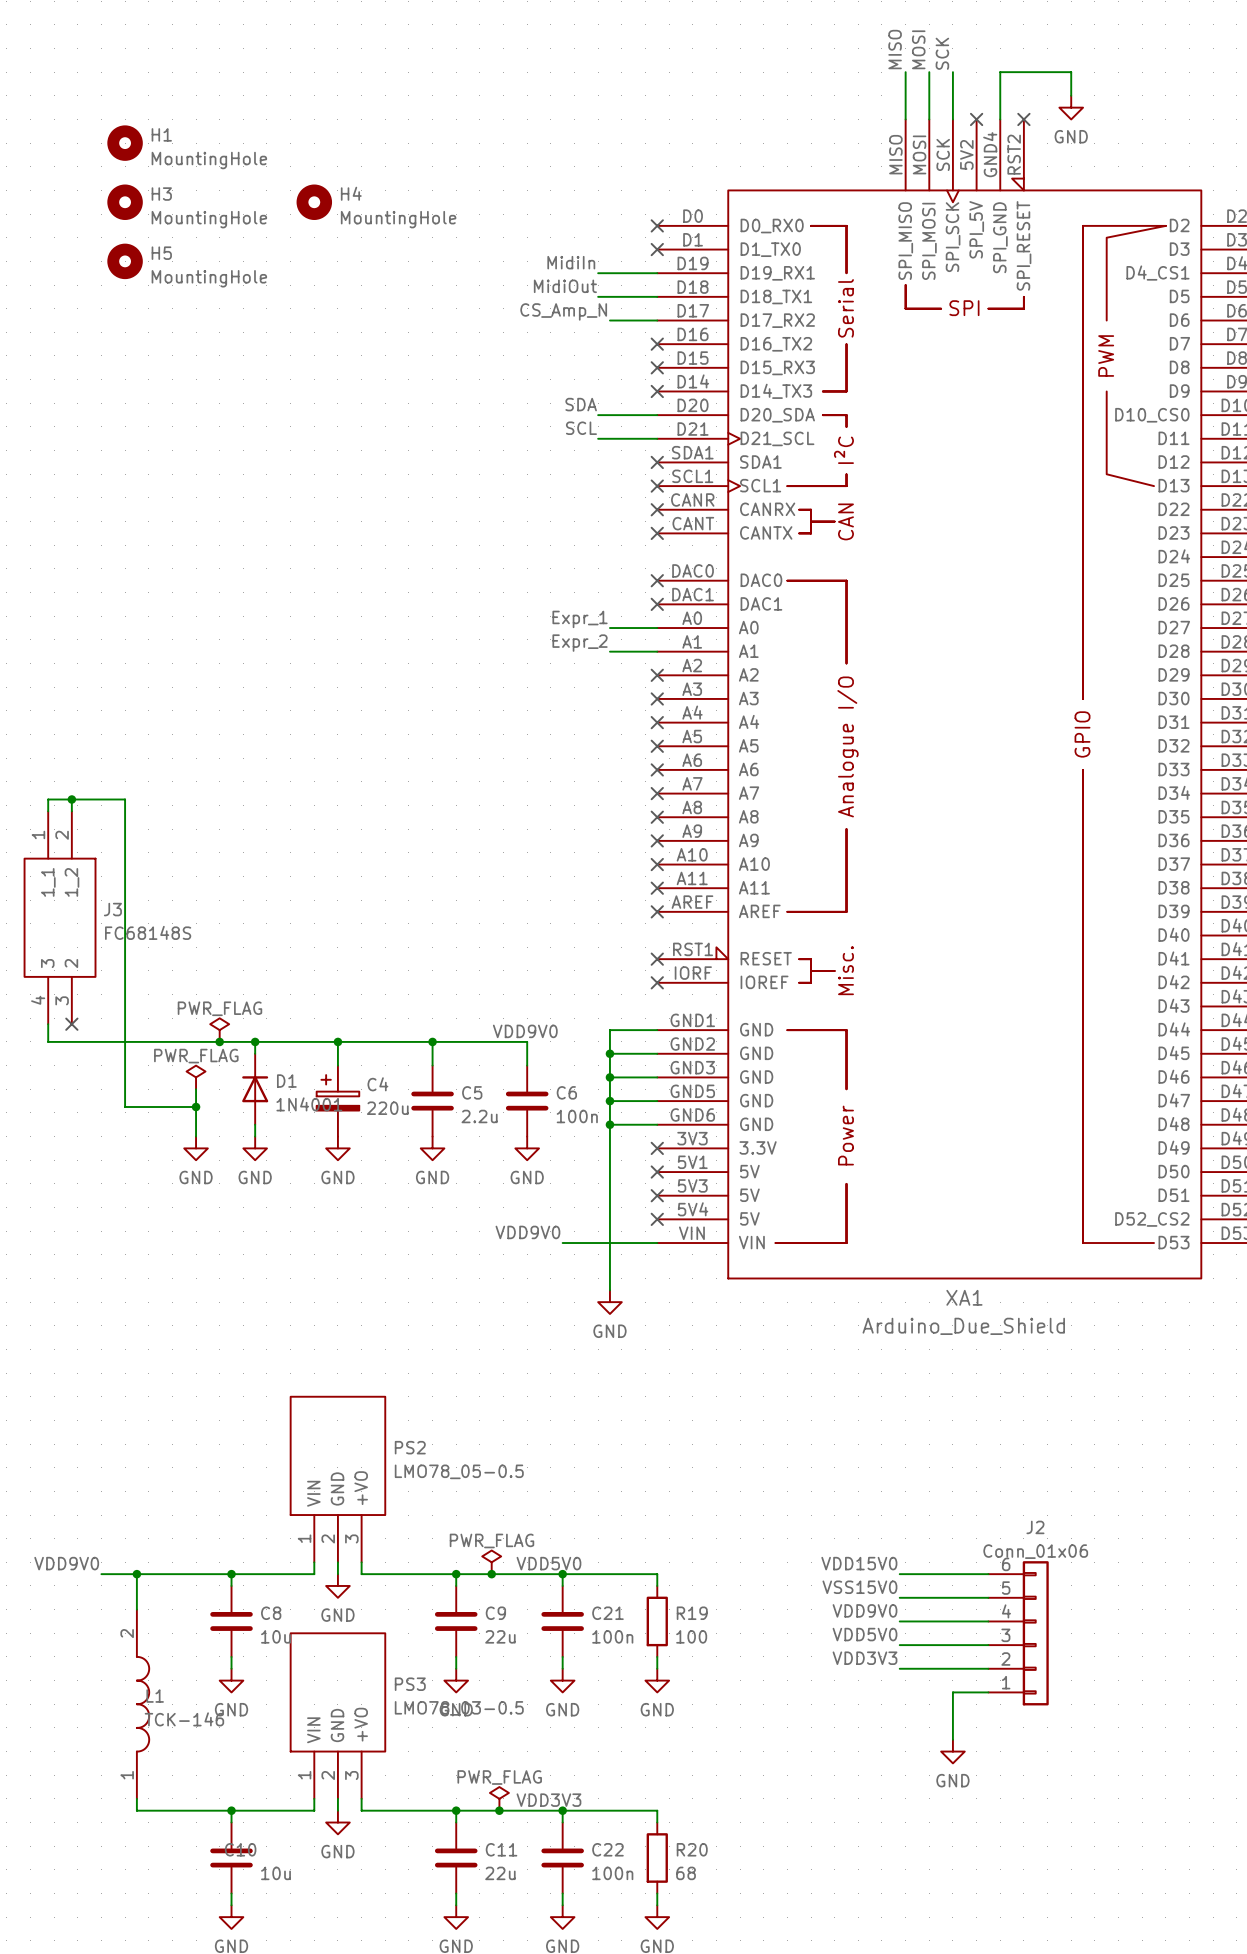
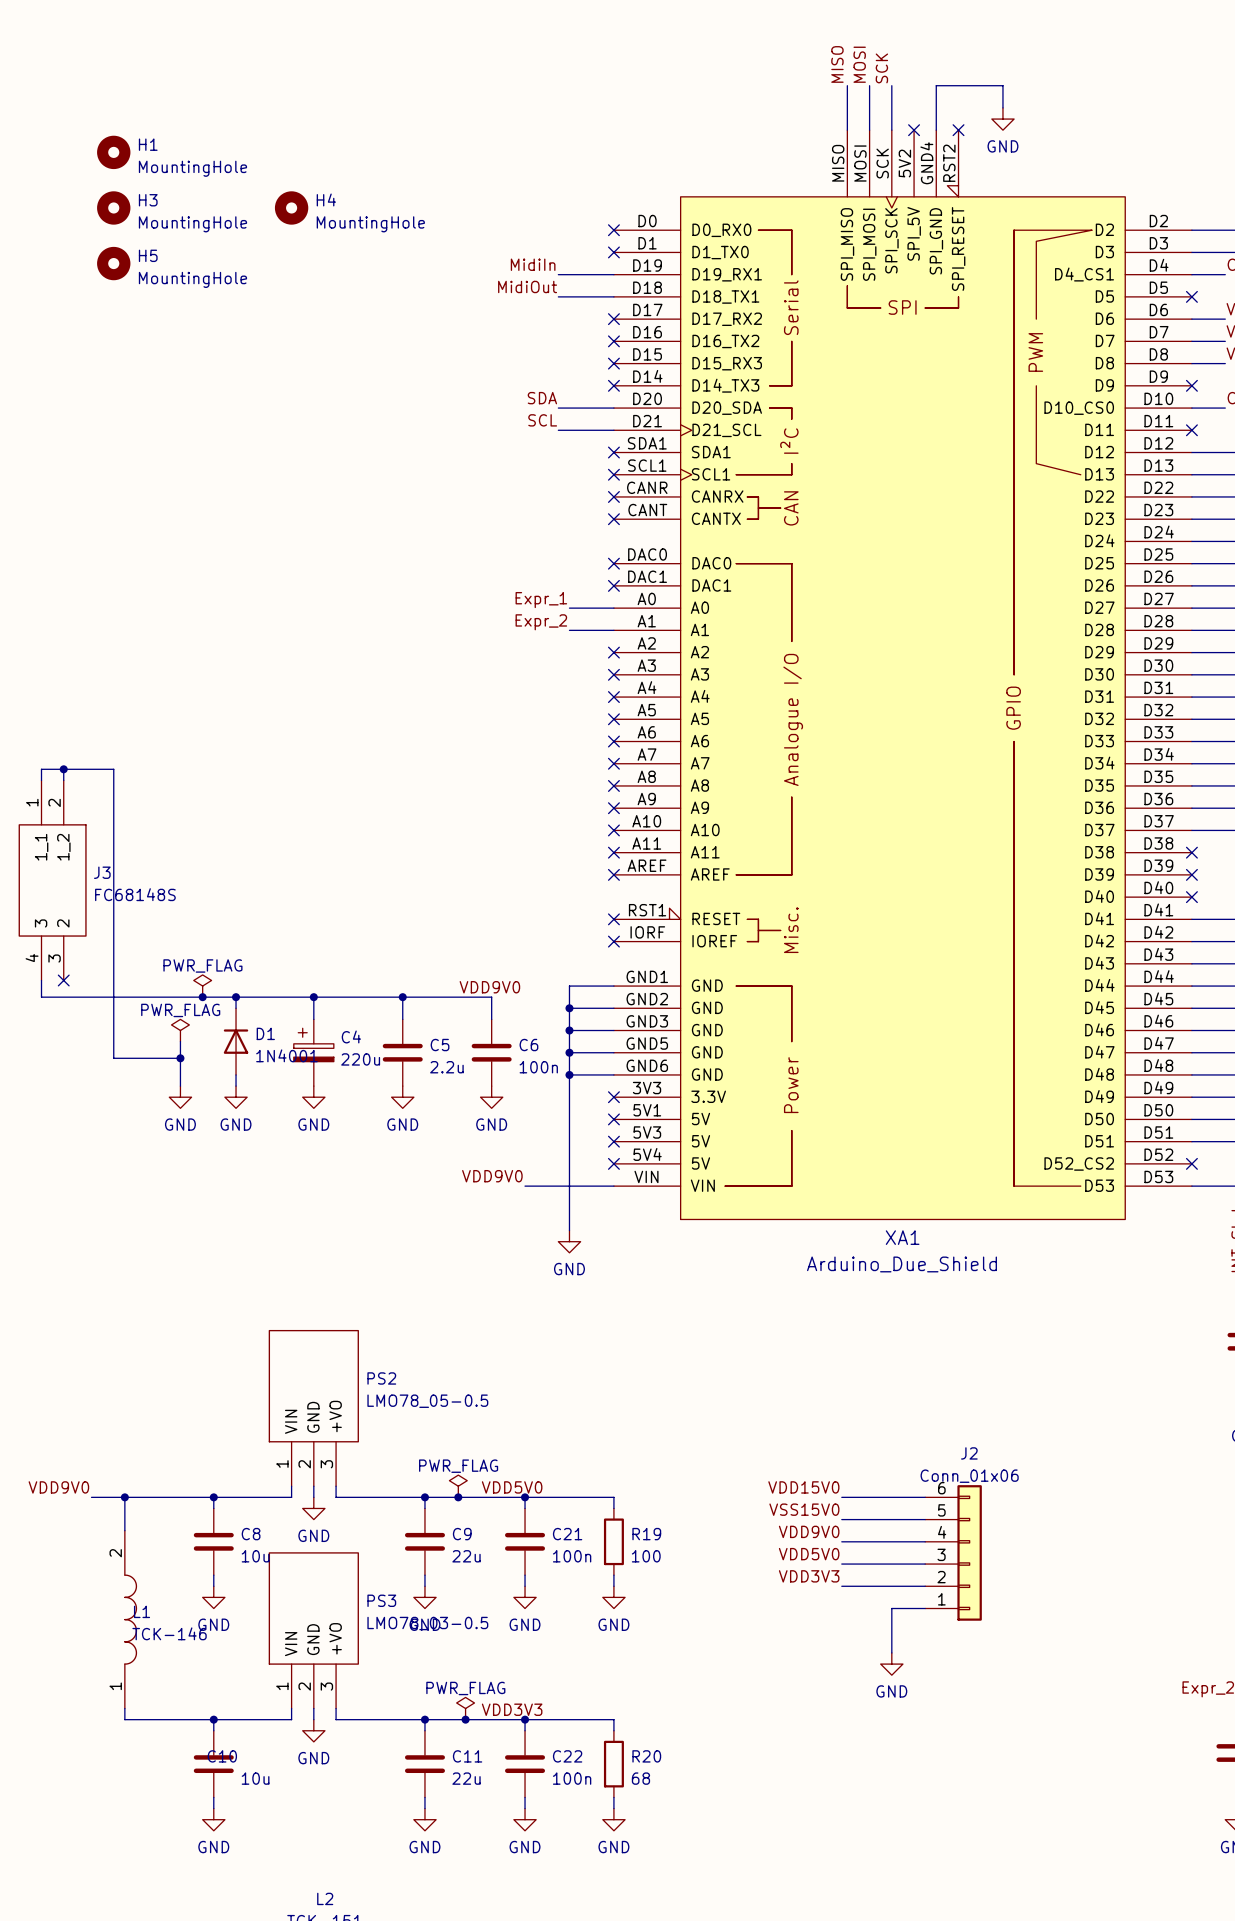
label: CS_Amp_N (563, 311) -> none
wire: (609, 320) (657, 320) -> none
no-connect mark: none -> (613, 319)

